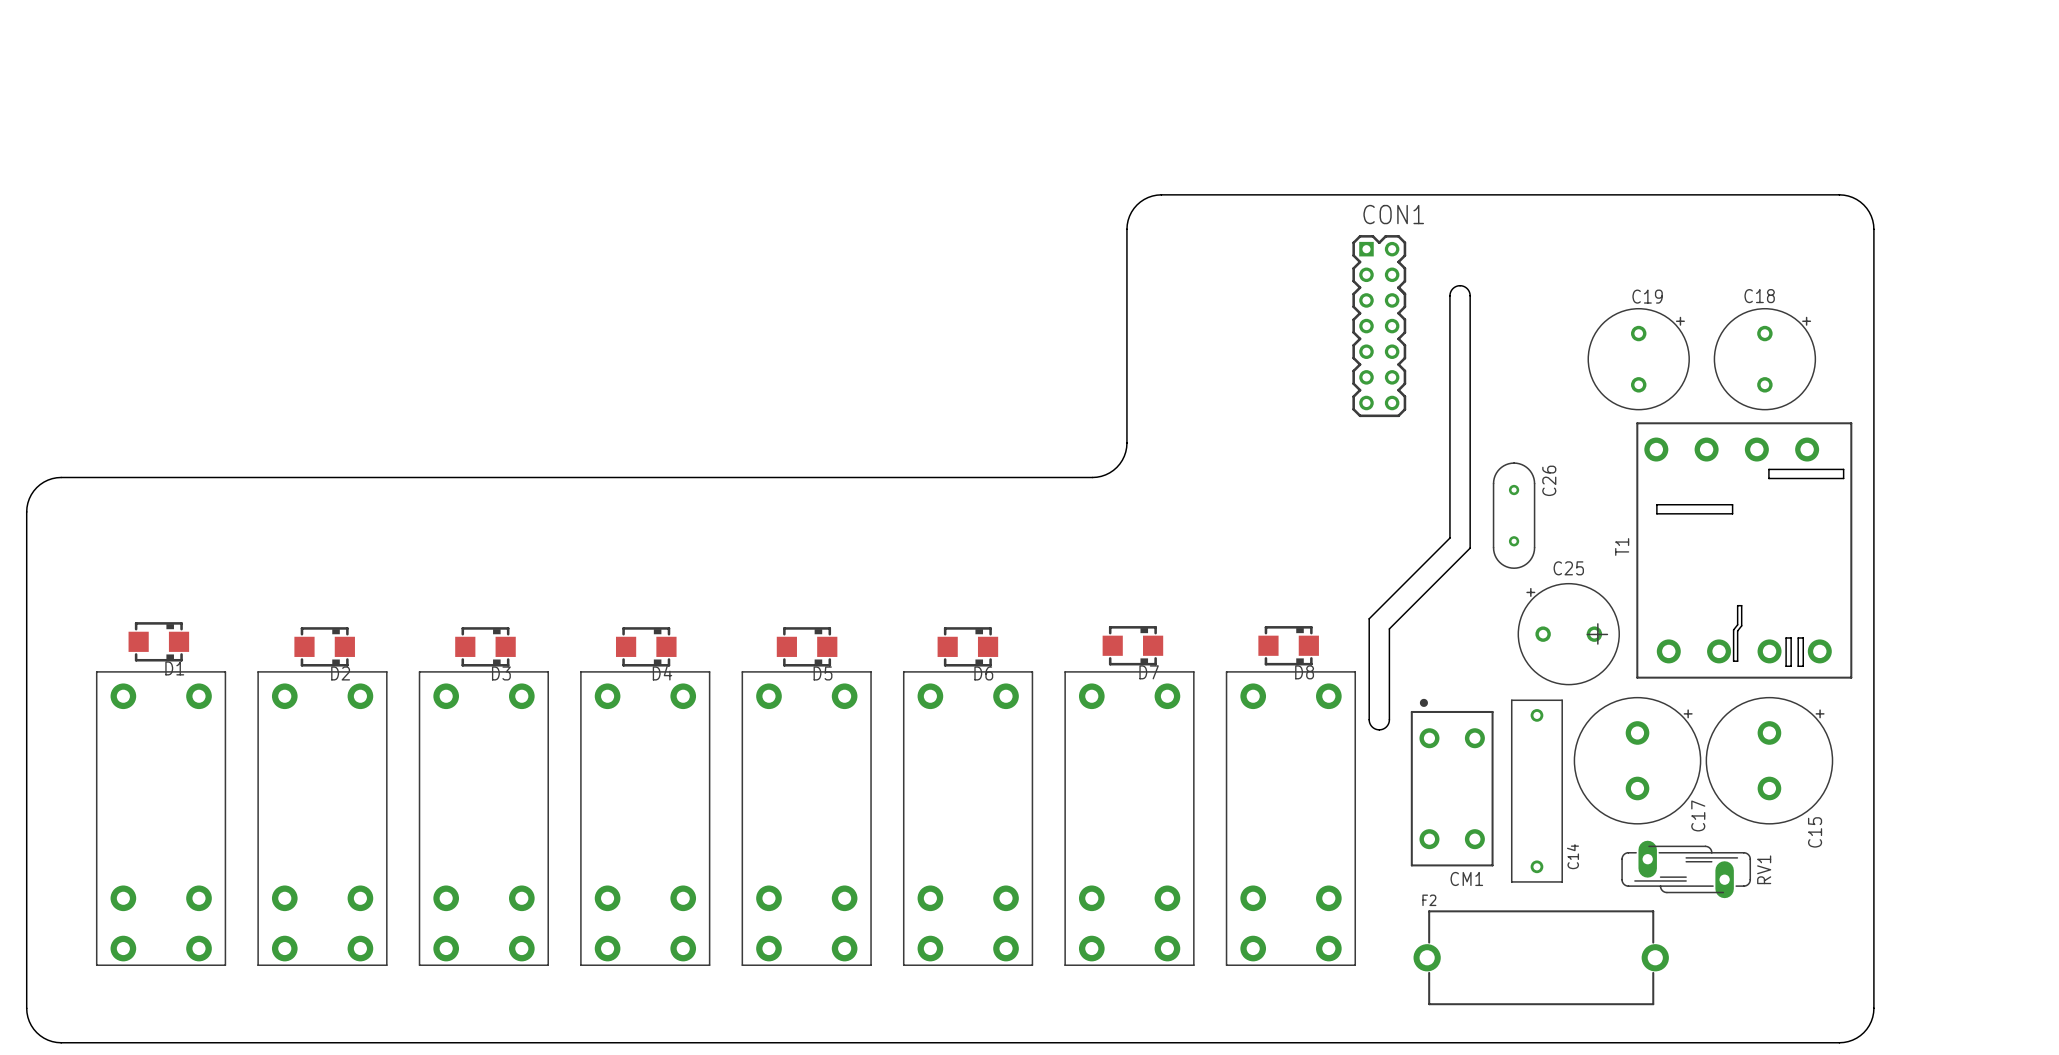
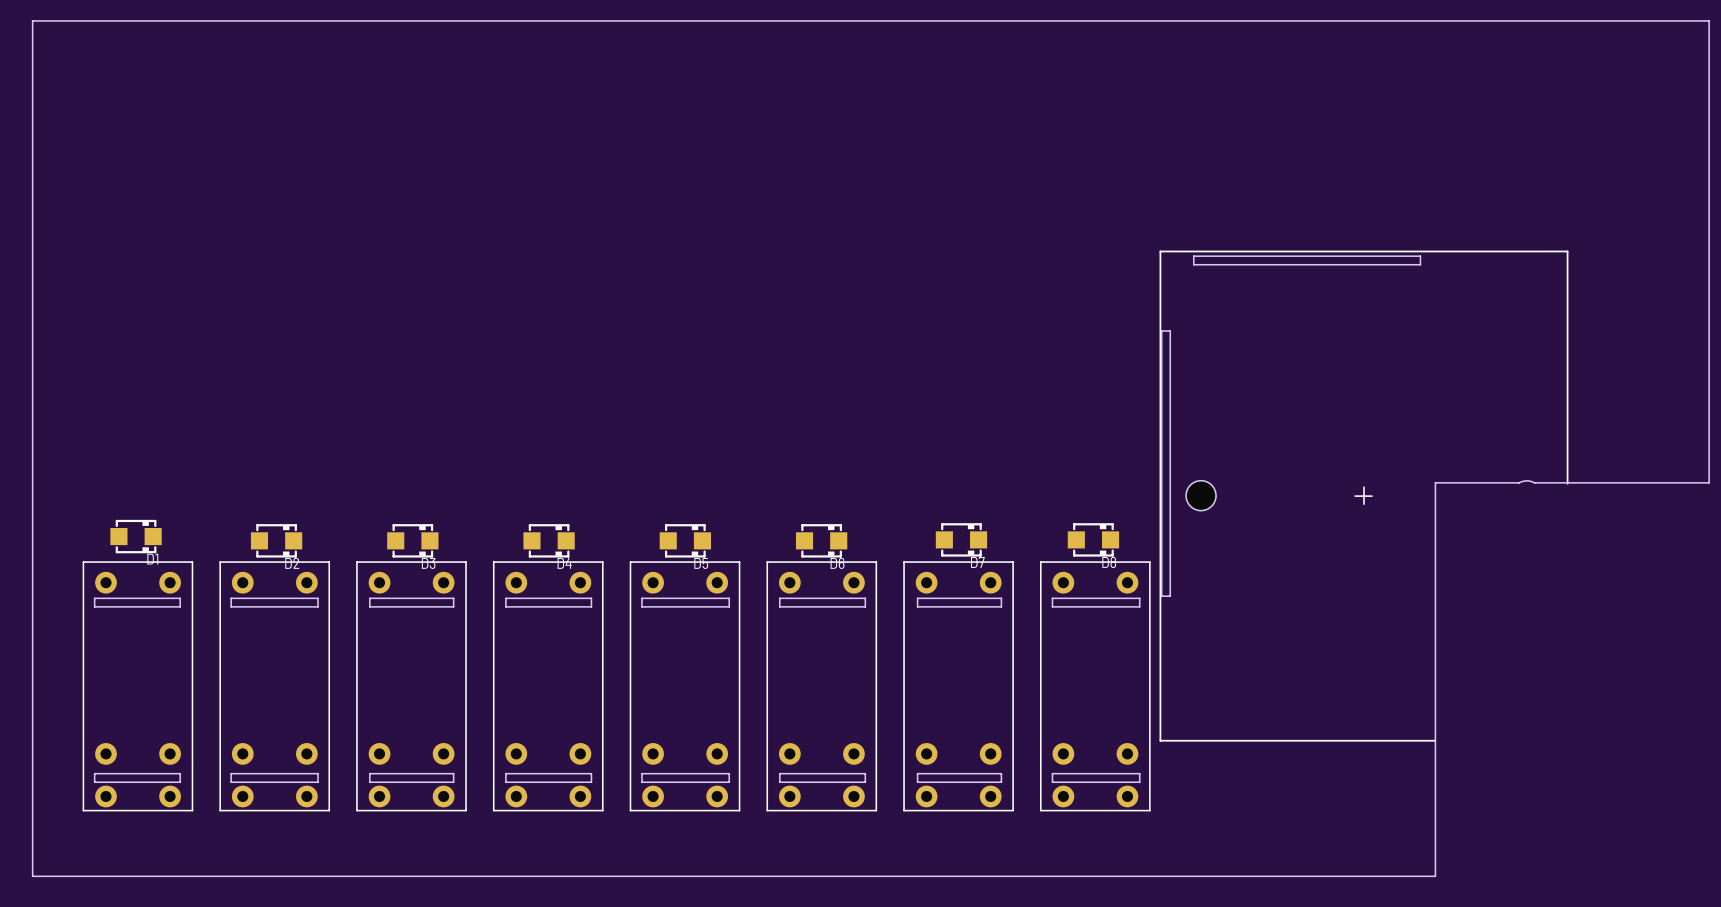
board edge: none -> (1193, 256) (1420, 256) (1420, 264) (1193, 264) (1193, 256)
CON1: (1379, 326) -> none
C19: (1638, 359) -> none
C18: (1764, 359) -> none
board edge: (1768, 469) (1843, 469) (1843, 478) (1768, 478) (1768, 469) -> none
board edge: (1656, 504) (1656, 513) (1732, 513) (1732, 504) (1656, 504) -> none
C26: (1514, 515) -> none
T1: (1744, 550) -> none
line: none -> (1567, 483) (1567, 251) (1160, 251) (1160, 740) (1435, 740)
hole: none -> (1201, 495)
board edge: (1737, 605) (1737, 624) (1733, 629) (1733, 661) (1737, 661) (1737, 630) (1741, 625) (1741, 605) (1737, 605) -> none
board edge: (1369, 618) (1449, 538) (1449, 295) (1453, 287) (1462, 286) (1468, 289) (1470, 295) (1470, 548) (1389, 628) (1389, 719) (1387, 725) (1380, 729) (1373, 727) (1369, 722) (1369, 712) -> (1161, 517) (1161, 331) (1170, 331) (1170, 596) (1161, 596)
line: (1597, 623) (1597, 644) -> (1363, 487) (1363, 504)
C25: (1568, 634) -> none
line: (1587, 634) (1607, 634) -> (1355, 496) (1372, 496)
board edge: (1786, 637) (1791, 637) (1791, 666) (1786, 666) (1786, 637) -> none
board edge: (1798, 637) (1798, 666) (1803, 666) (1803, 637) (1798, 637) -> none
board edge: none -> (94, 598) (94, 606) (180, 606) (180, 598) (94, 598)
board edge: none -> (231, 598) (231, 606) (317, 606) (317, 598) (231, 598)
board edge: none -> (369, 598) (369, 606) (453, 606) (453, 598) (369, 598)
board edge: none -> (505, 598) (505, 606) (591, 606) (591, 598) (505, 598)
board edge: none -> (641, 598) (641, 606) (729, 606) (729, 598) (641, 598)
board edge: none -> (779, 598) (779, 606) (865, 606) (865, 598) (779, 598)
board edge: none -> (917, 598) (917, 606) (1001, 606) (1001, 598) (917, 598)
board edge: none -> (1052, 598) (1052, 606) (1139, 606) (1139, 598) (1052, 598)
C17: (1637, 760) -> none
C15: (1769, 760) -> none
CM1: (1452, 782) -> none
C14: (1536, 791) -> none
RV1: (1686, 869) -> none
board edge: none -> (94, 773) (180, 773) (180, 782) (94, 782) (94, 773)
board edge: none -> (231, 773) (317, 773) (317, 782) (231, 782) (231, 773)
board edge: none -> (369, 773) (453, 773) (453, 782) (369, 782) (369, 773)
board edge: none -> (505, 773) (591, 773) (591, 782) (505, 782) (505, 773)
board edge: none -> (641, 773) (729, 773) (729, 782) (641, 782) (641, 773)
board edge: none -> (779, 773) (865, 773) (865, 782) (779, 782) (779, 773)
board edge: none -> (917, 773) (1001, 773) (1001, 782) (917, 782) (917, 773)
board edge: none -> (1052, 773) (1139, 773) (1139, 782) (1052, 782) (1052, 773)
F2: (1541, 957) -> none
board edge: (61, 1042) (47, 1040) (36, 1032) (29, 1021) (26, 1008) (26, 511) (31, 494) (40, 484) (47, 480) (61, 477) (1096, 477) (1109, 472) (1116, 467) (1122, 460) (1126, 447) (1127, 224) (1134, 208) (1148, 197) (1161, 194) (1843, 195) (1856, 199) (1866, 208) (1872, 220) (1873, 229) (1873, 1012) (1869, 1025) (1863, 1032) (1856, 1038) (1843, 1042) (1692, 1042) -> (53, 876) (32, 876) (32, 20) (1709, 20) (1709, 482) (1534, 482) (1526, 480) (1519, 482) (1435, 482) (1435, 876)

